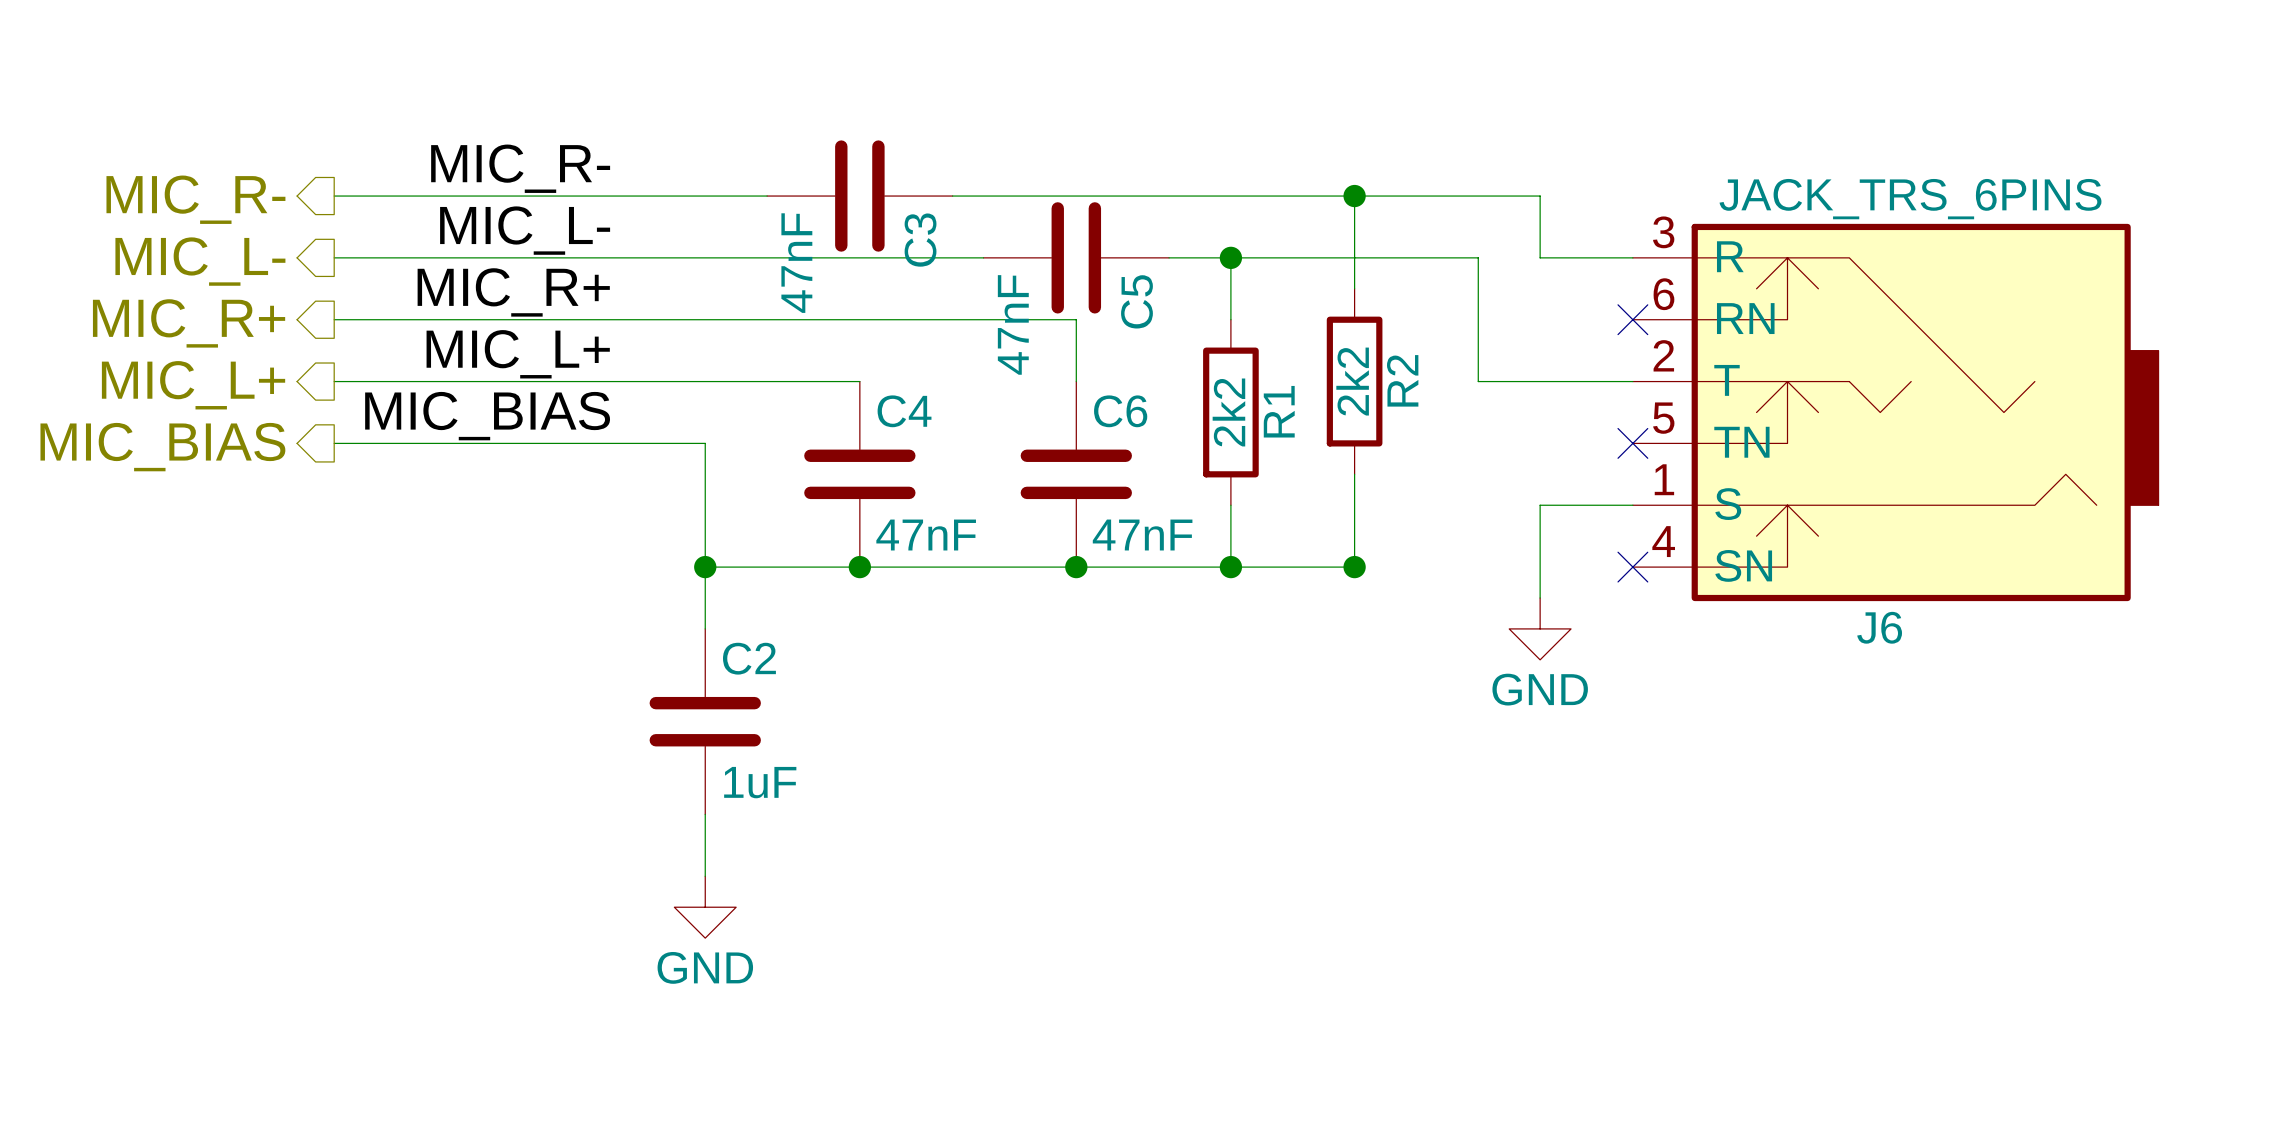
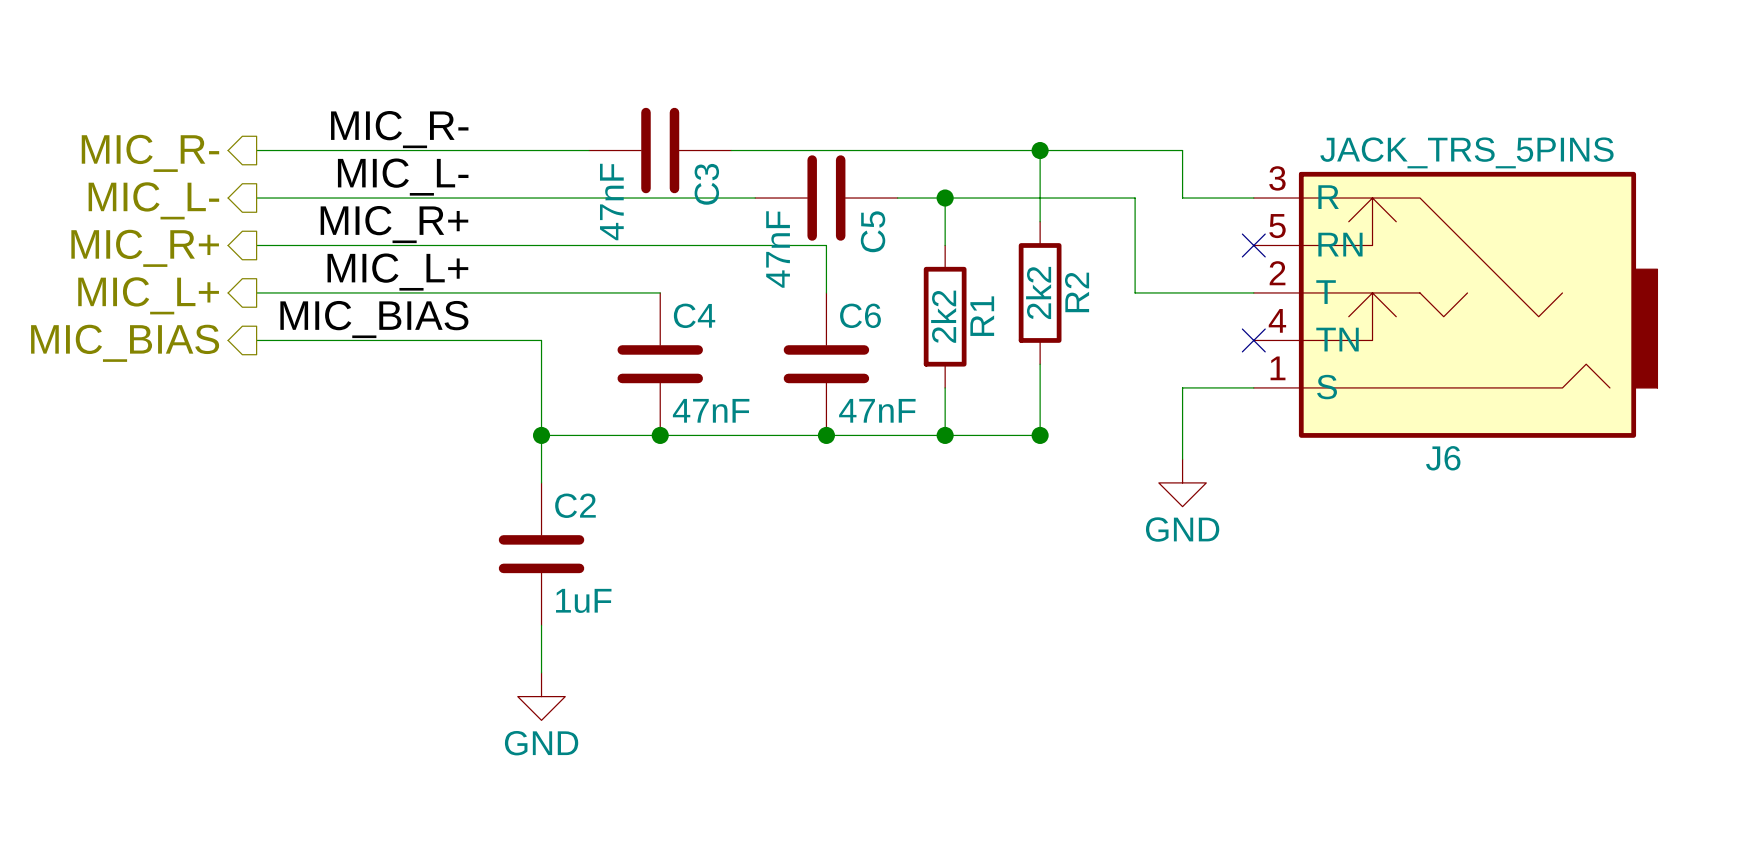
J6 value: JACK_TRS_6PINS (1910, 199) -> JACK_TRS_5PINS (1466, 152)
J6 symbol: [1632, 223, 2159, 602] -> [1253, 171, 1658, 438]
no-connect mark: (1632, 567) -> none

